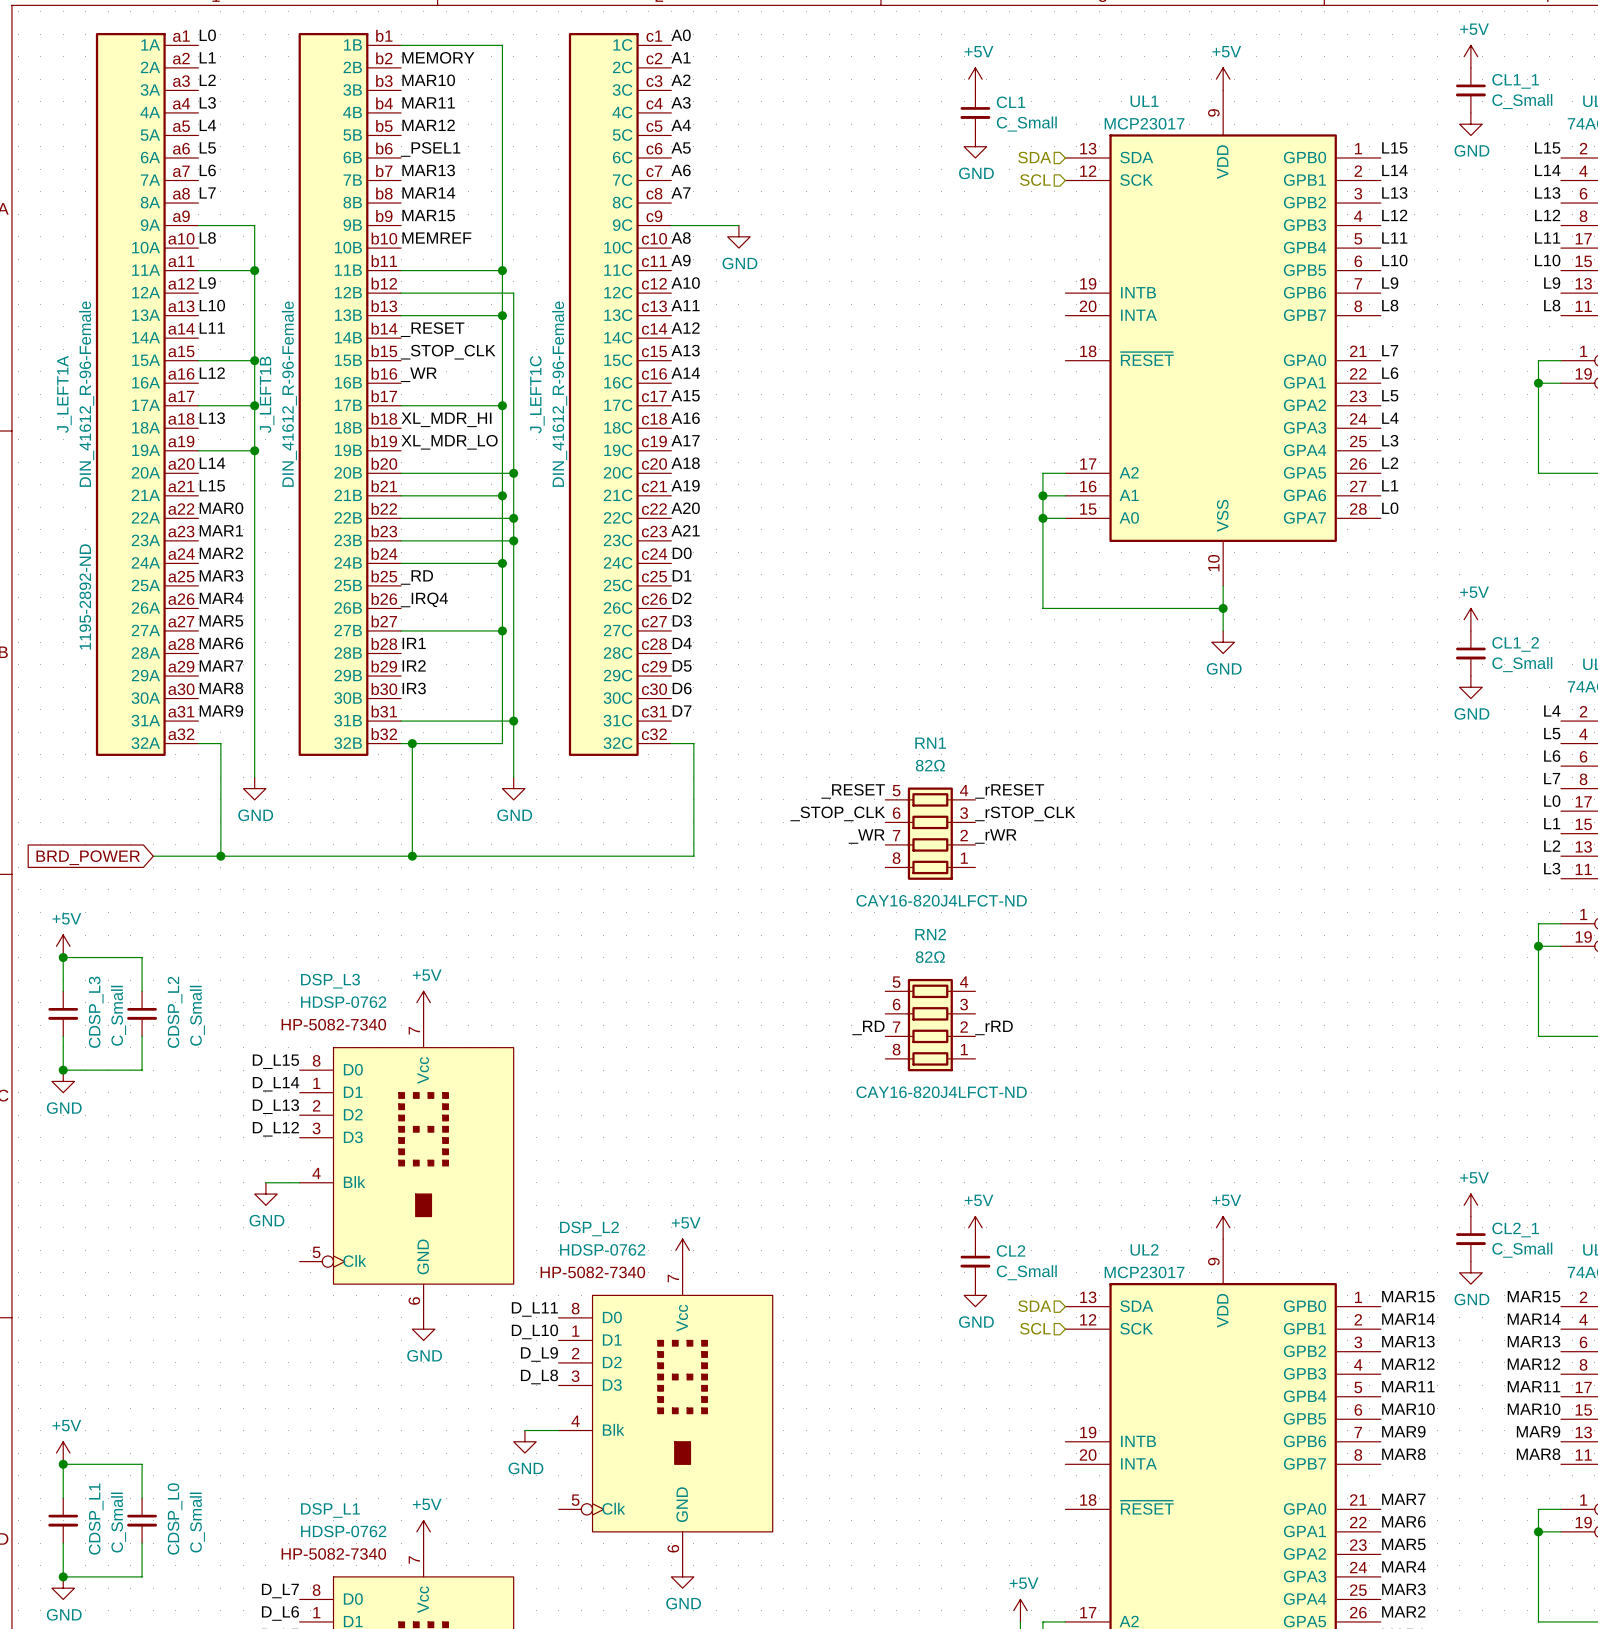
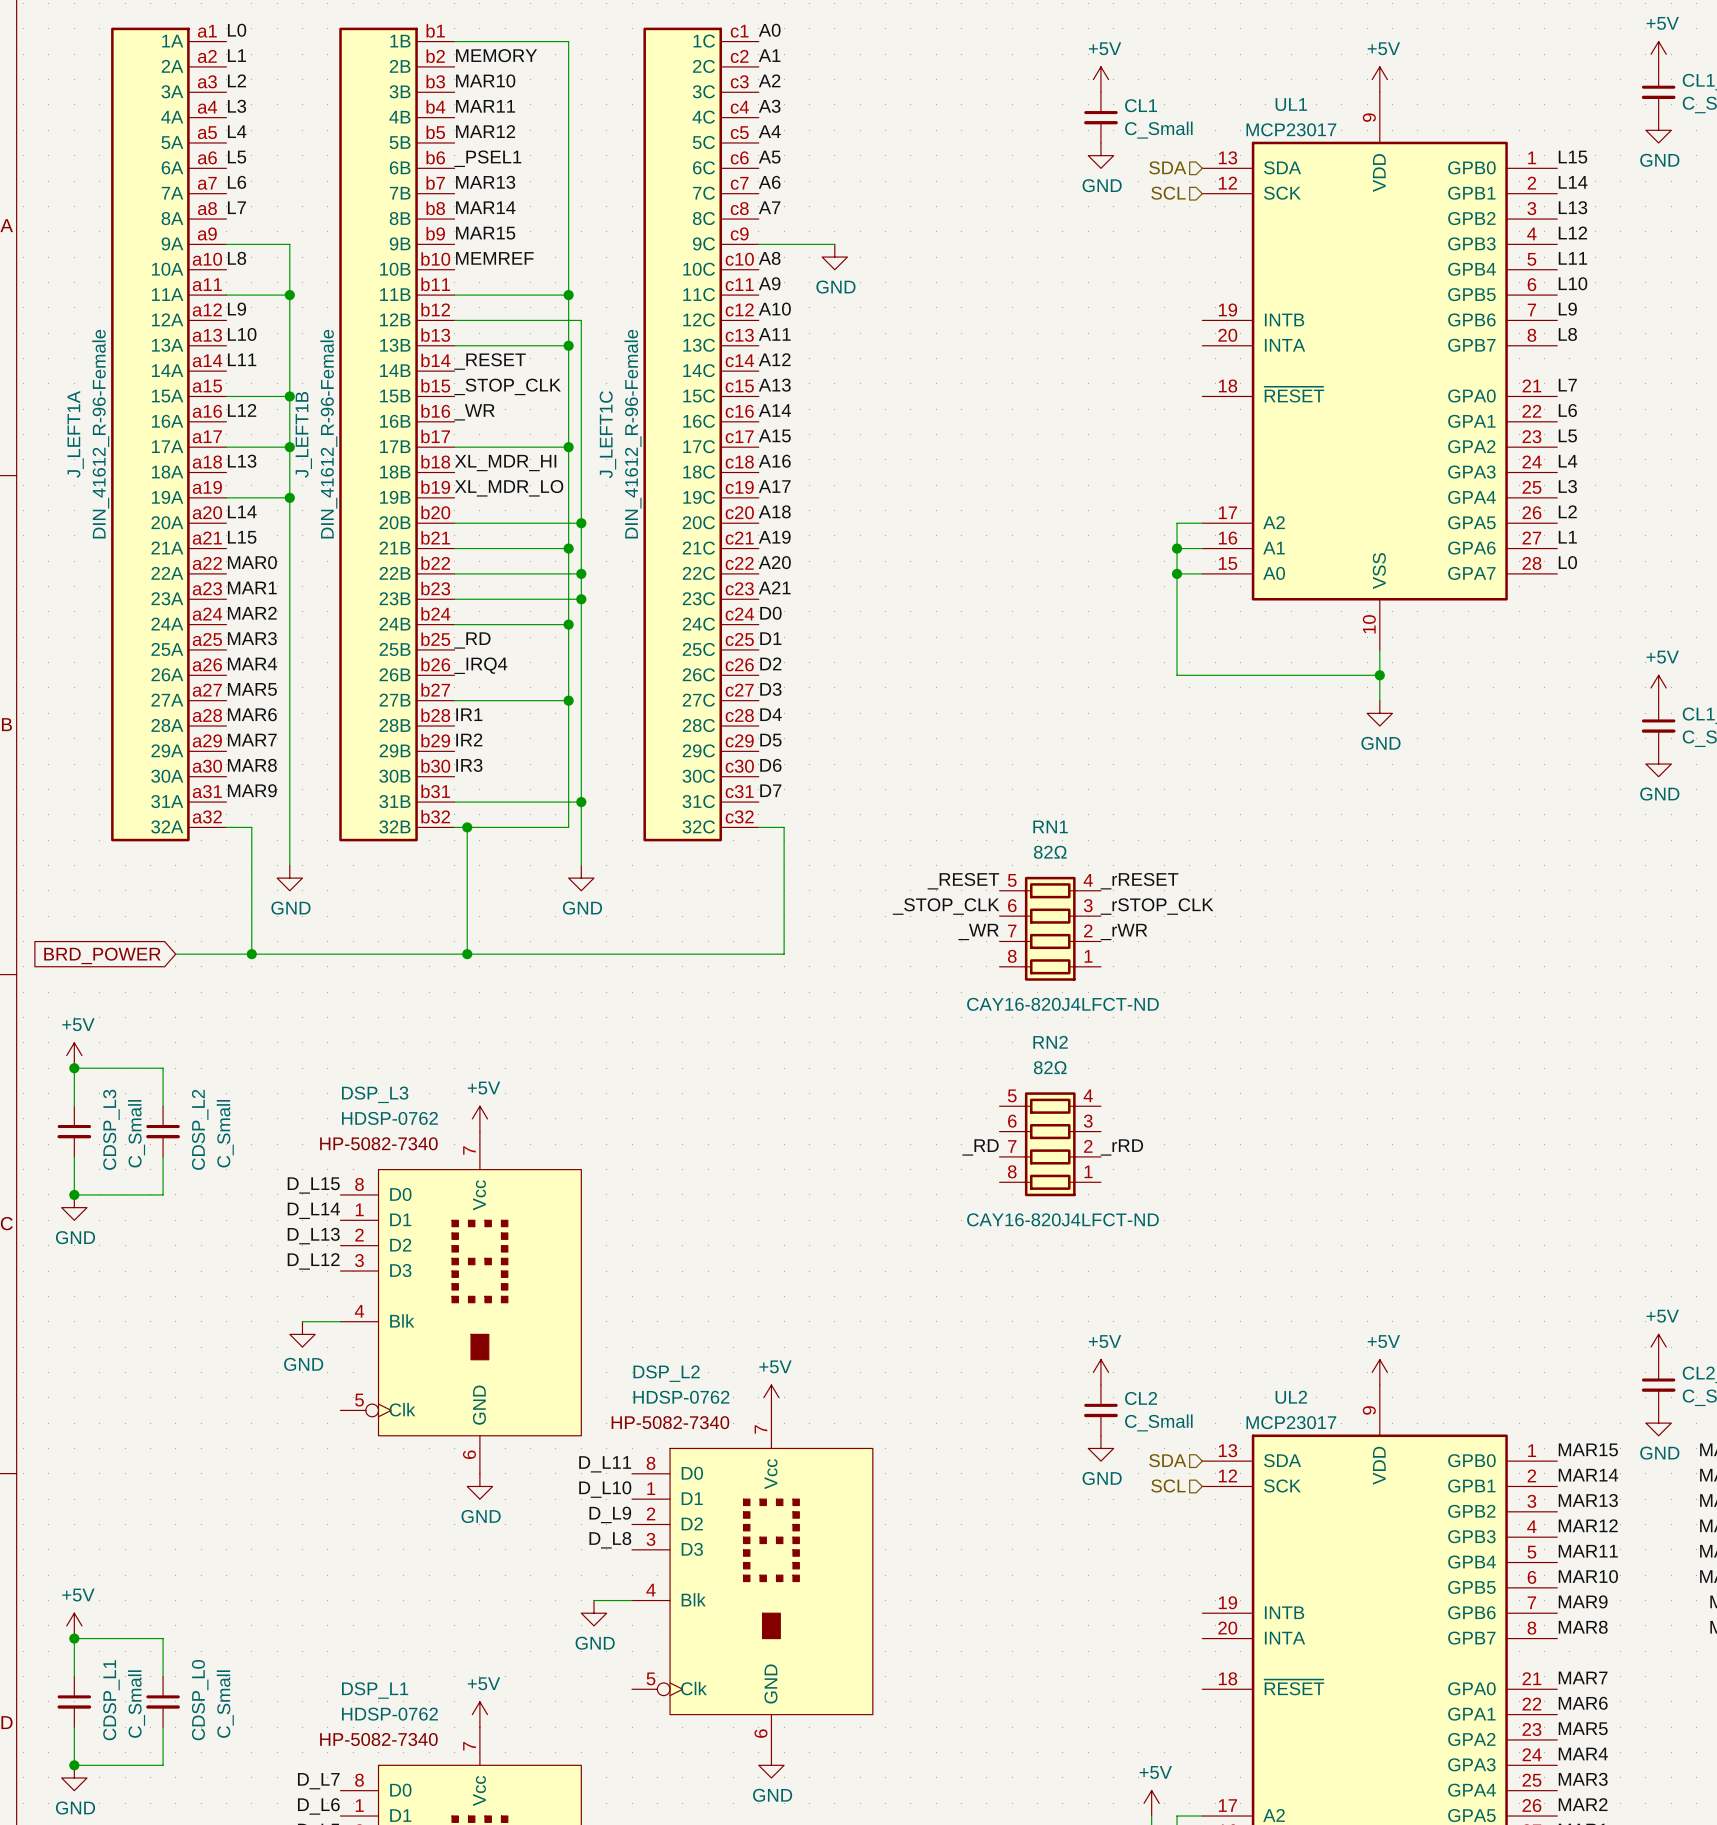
J_LEFT1A text: 1195-2892-ND (85, 596) -> none

